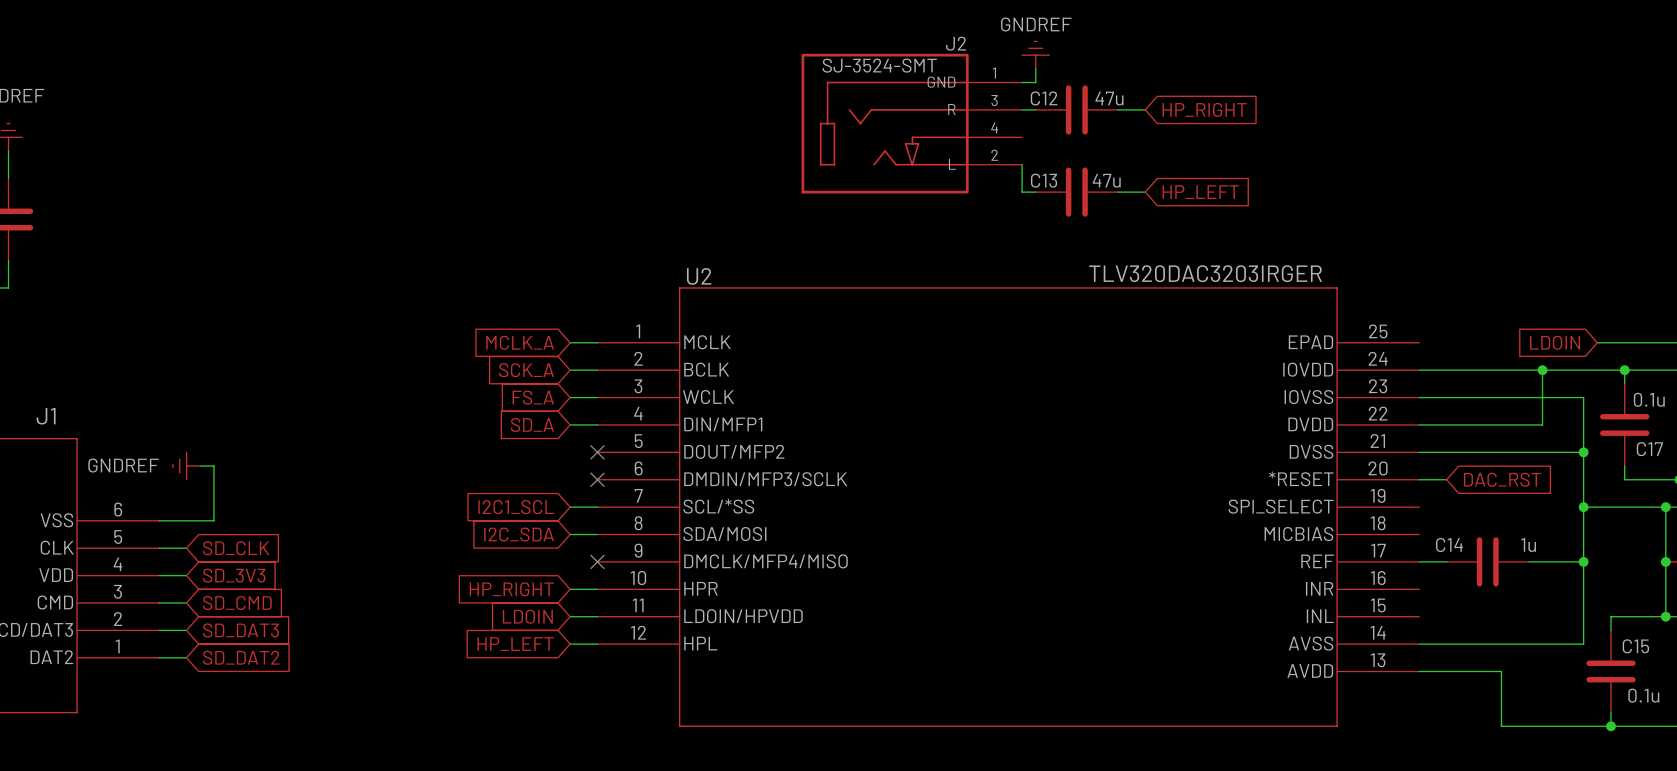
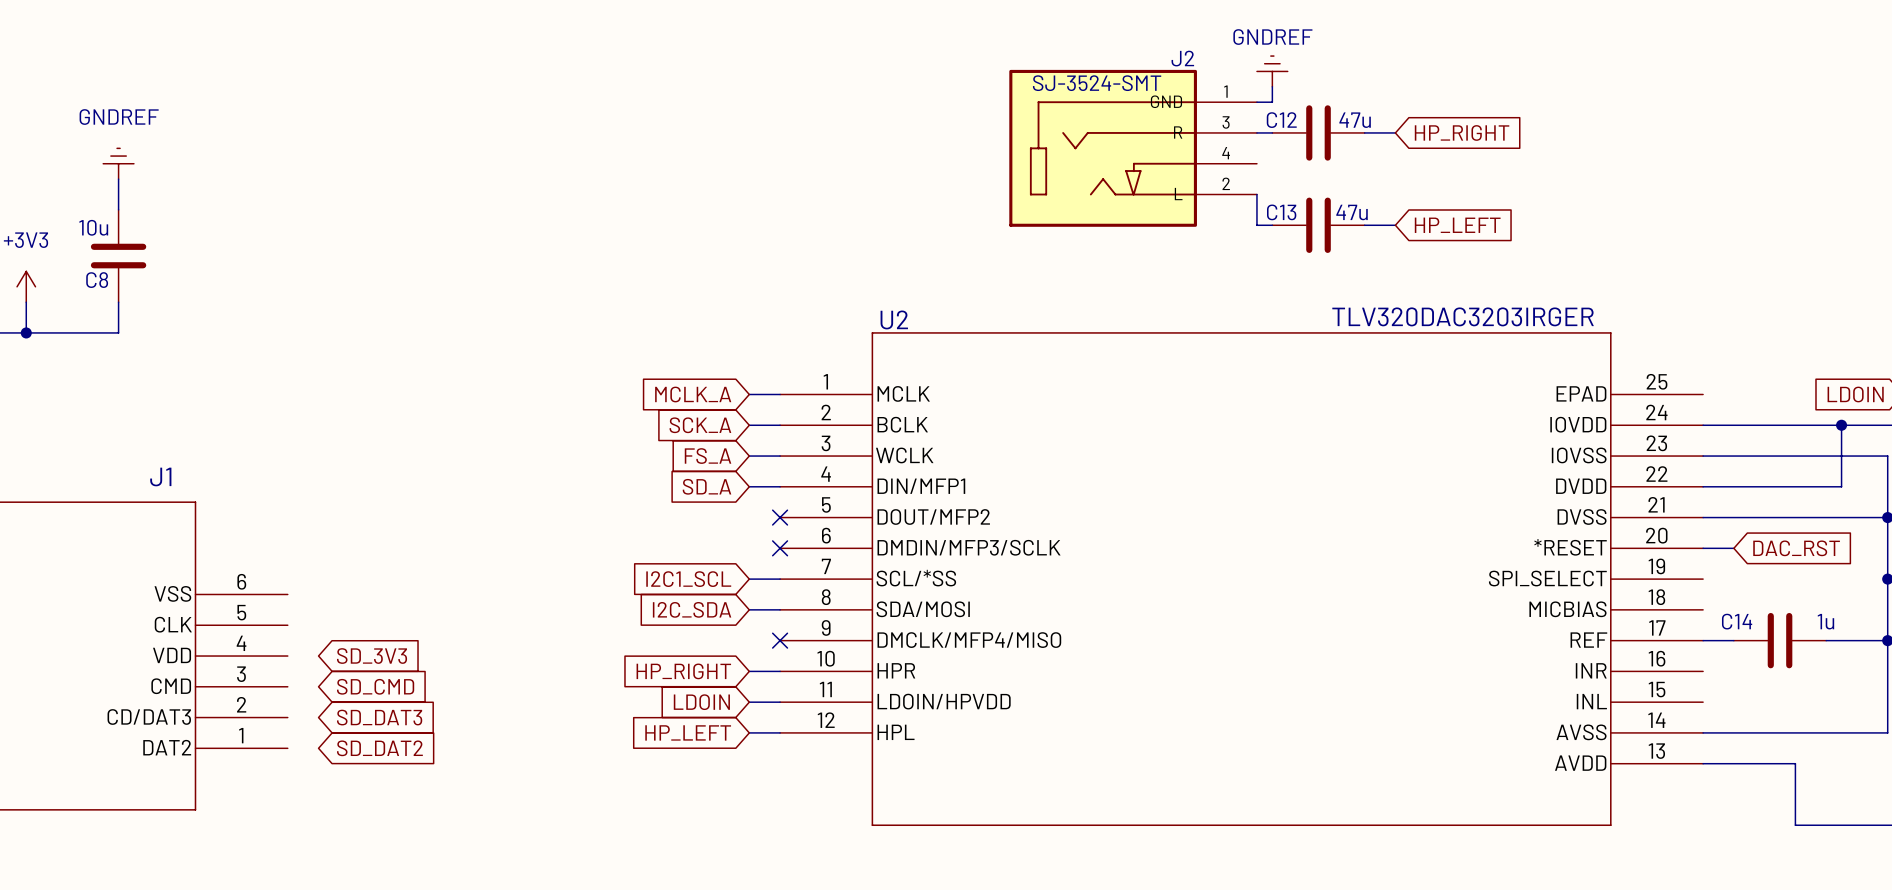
power symbol: GNDREF (186, 466) -> none
wire: (200, 466) (213, 466) (213, 520) (159, 520) -> none
wire: (159, 548) (186, 548) -> none
global label: SD_CLK (236, 548) -> none
wire: (159, 575) (186, 575) -> none
wire: (159, 603) (186, 603) -> none
wire: (159, 630) (186, 630) -> none
wire: (159, 657) (186, 657) -> none

